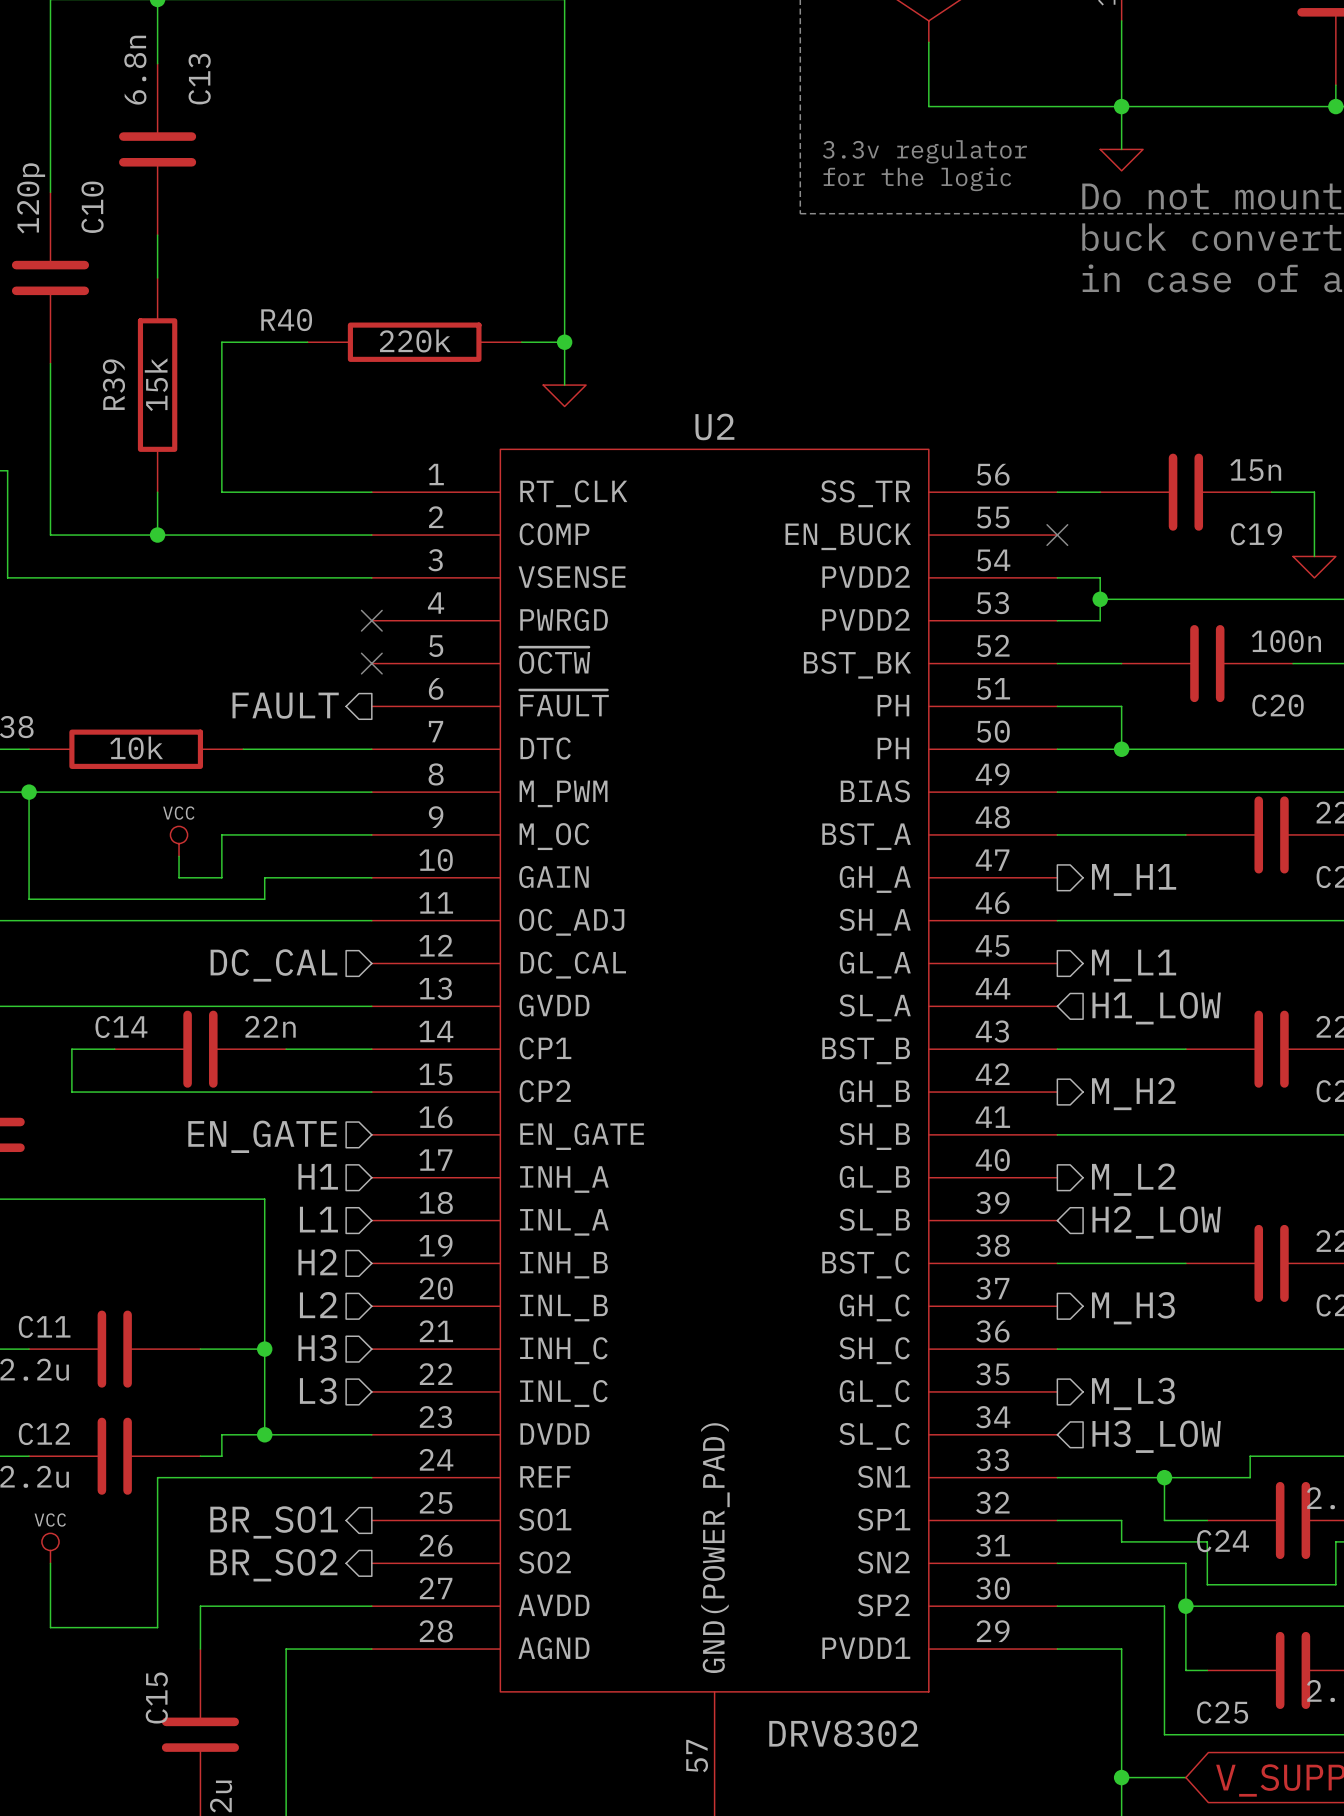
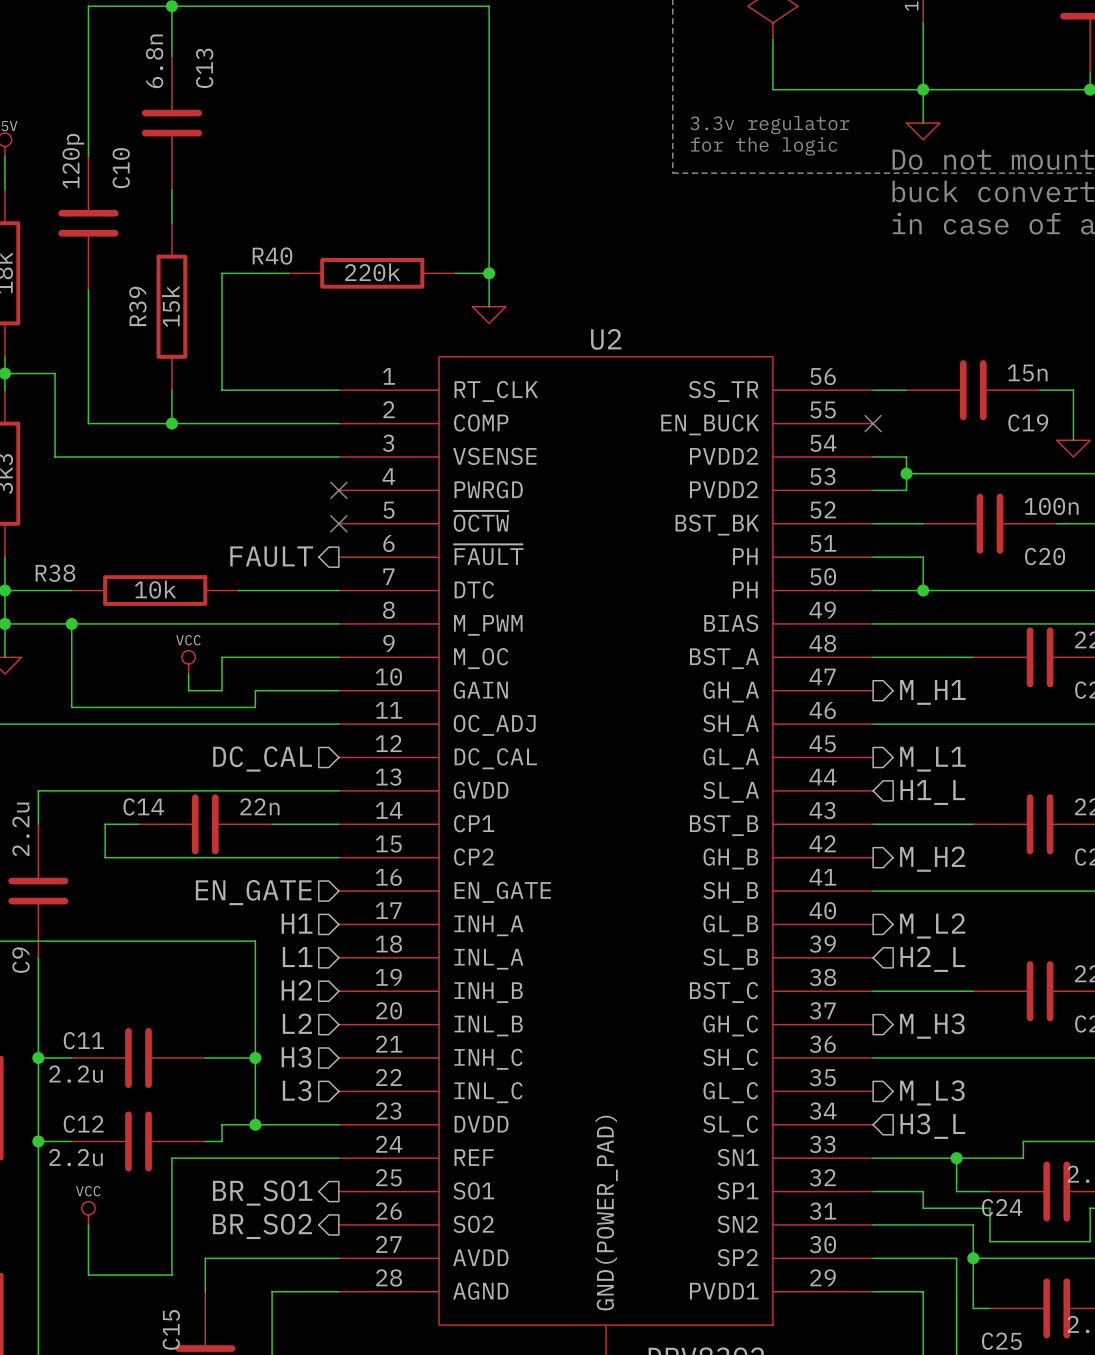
hierarchical label: H1_LOW (1156, 1008) -> H1_L (932, 792)
hierarchical label: H2_LOW (1156, 1222) -> H2_L (932, 959)
hierarchical label: H3_LOW (1156, 1436) -> H3_L (932, 1126)

